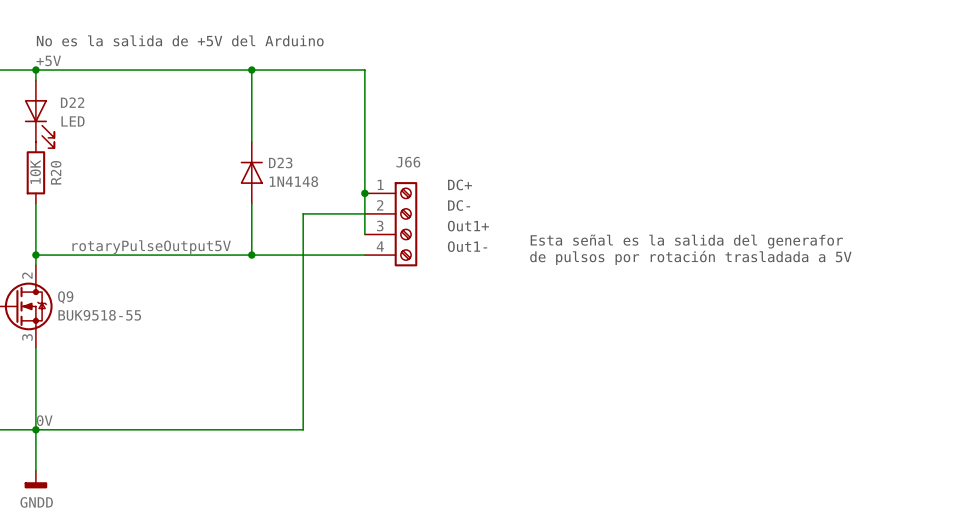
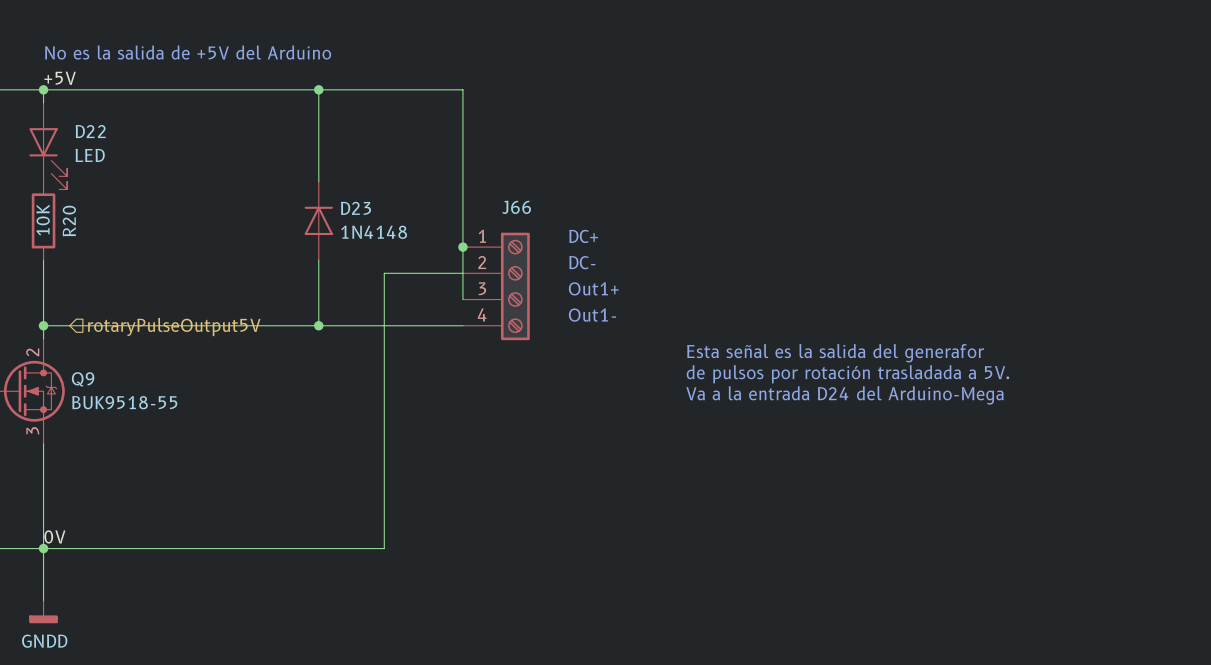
text position: Esta señal es la salida del generafor (686, 241) -> Esta señal es la salida del generafor (835, 353)
label: rotaryPulseOutput5V (151, 247) -> none
hierarchical label: none -> rotaryPulseOutput5V (174, 326)
text: de pulsos por rotación trasladada a 5V (690, 257) -> none
text: none -> de pulsos por rotación trasladada a 5V. (847, 374)
text: none -> Va a la entrada D24 del Arduino-Mega (845, 395)

